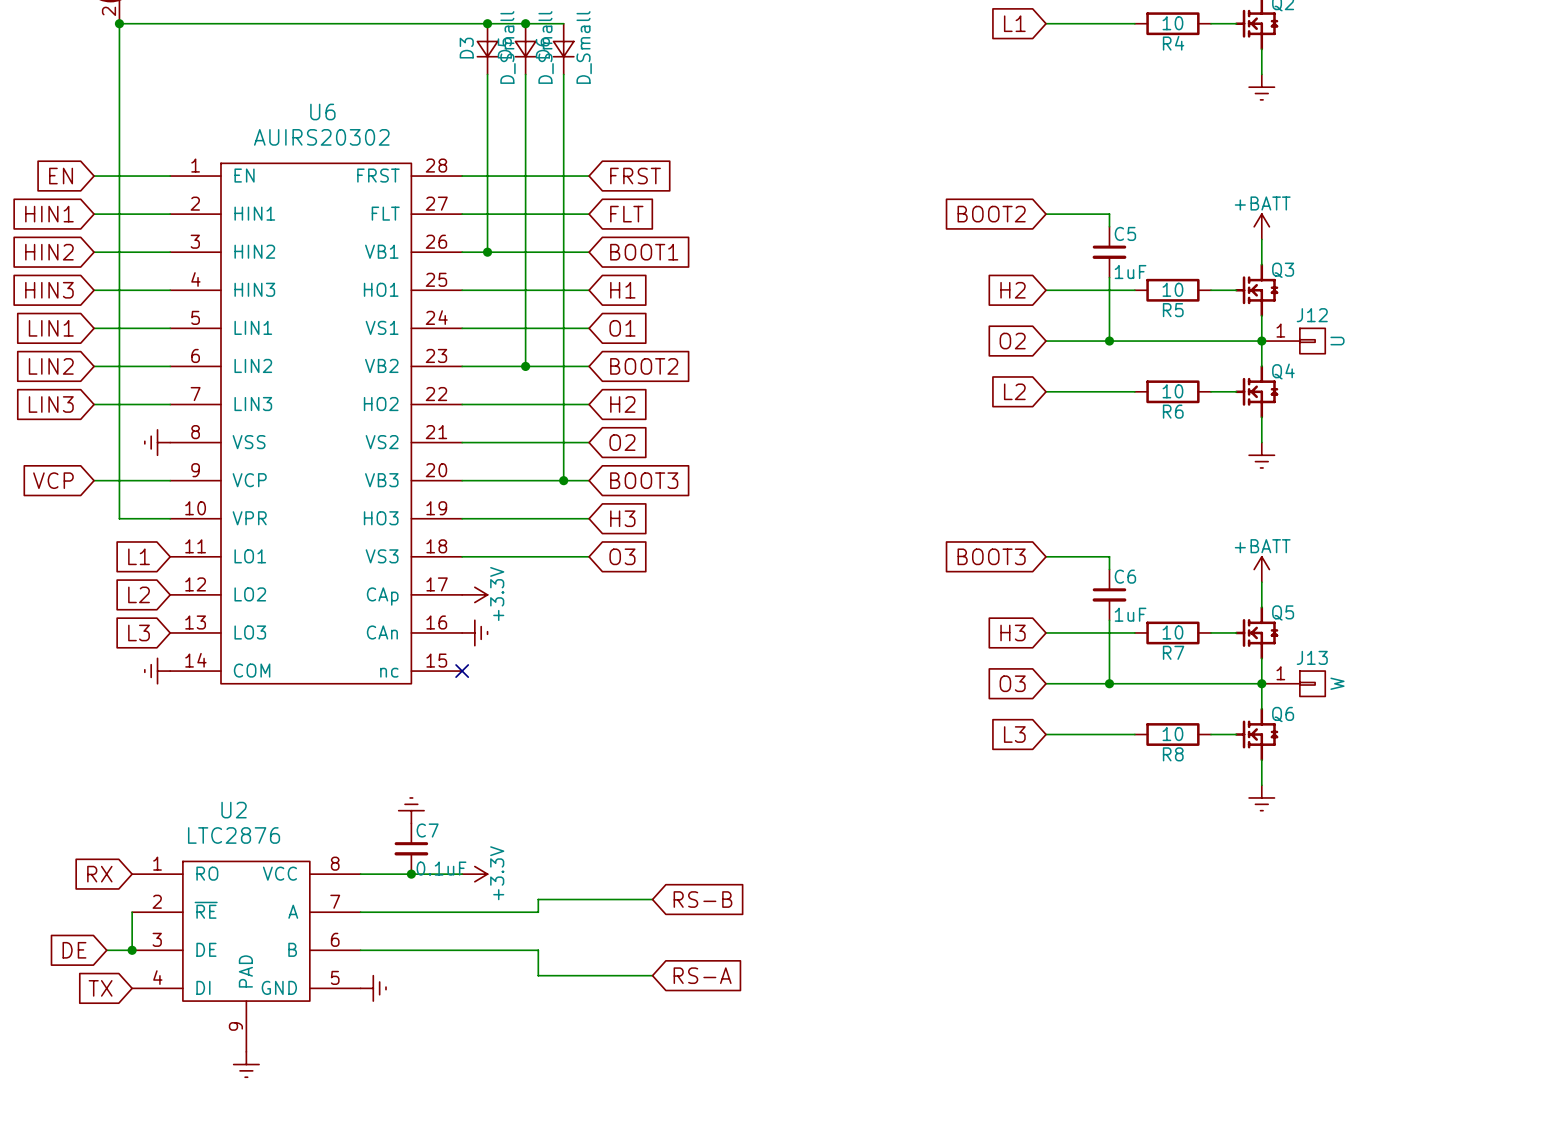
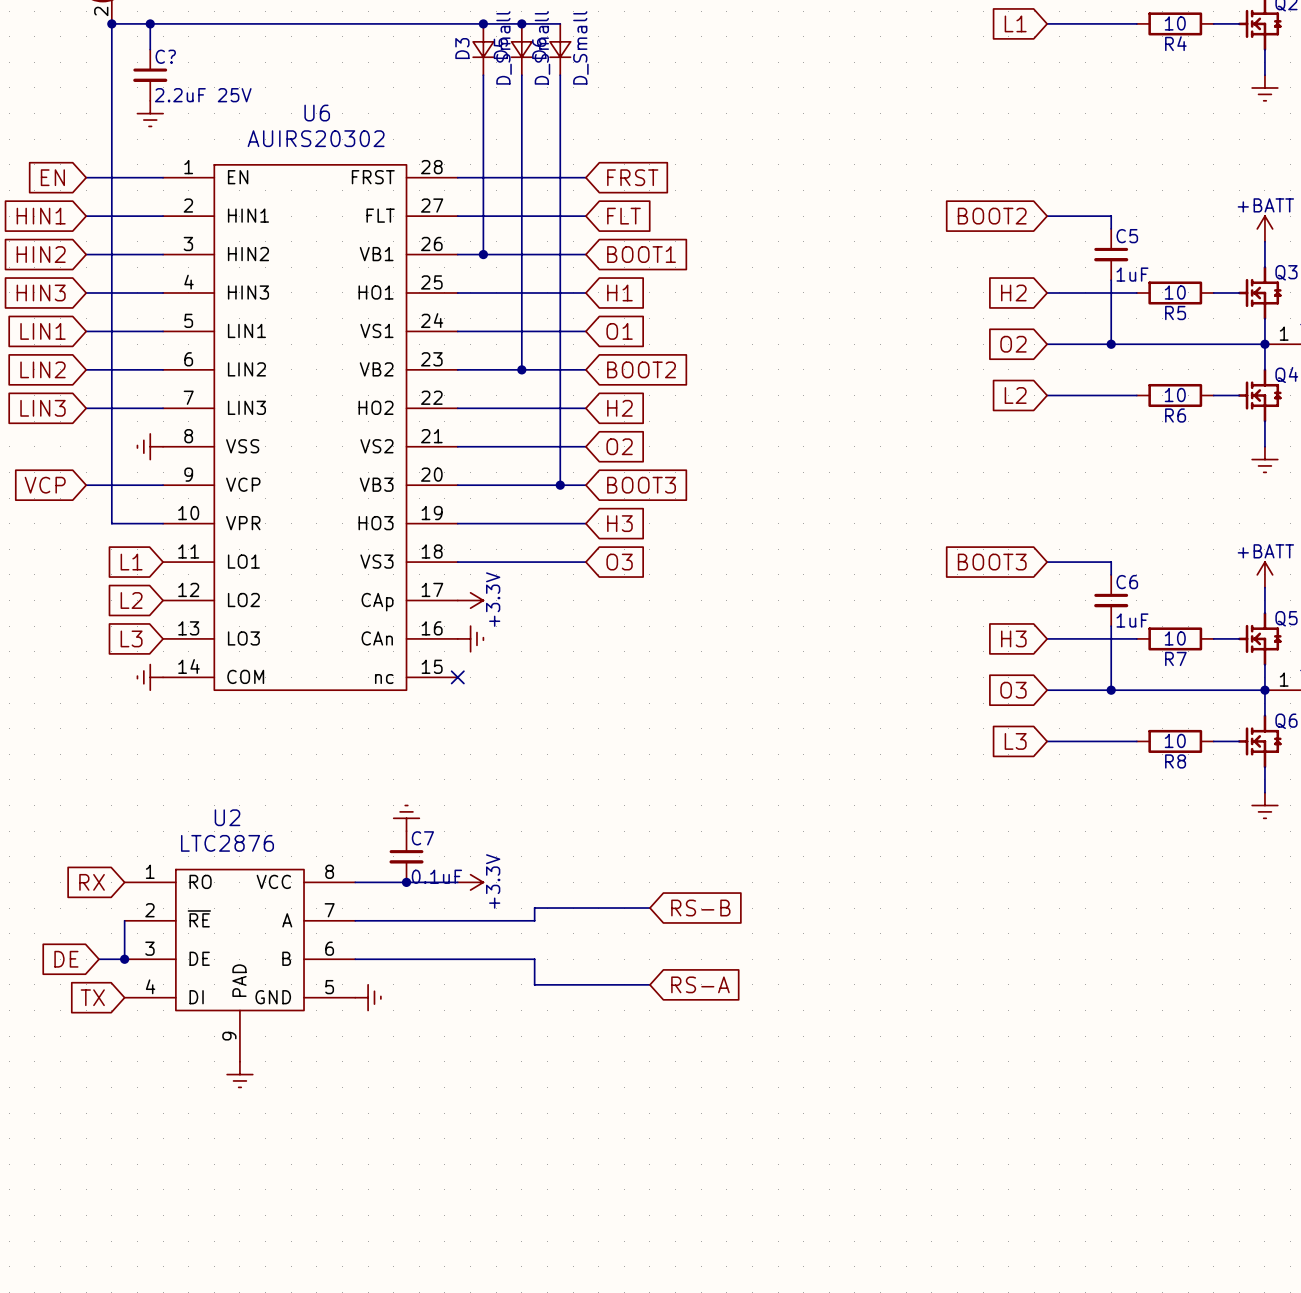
wire: none -> (150, 23) (150, 49)
junction: none -> (150, 23)
C?: none -> 2.2uF 25V (150, 75)
power symbol: none -> (150, 113)

